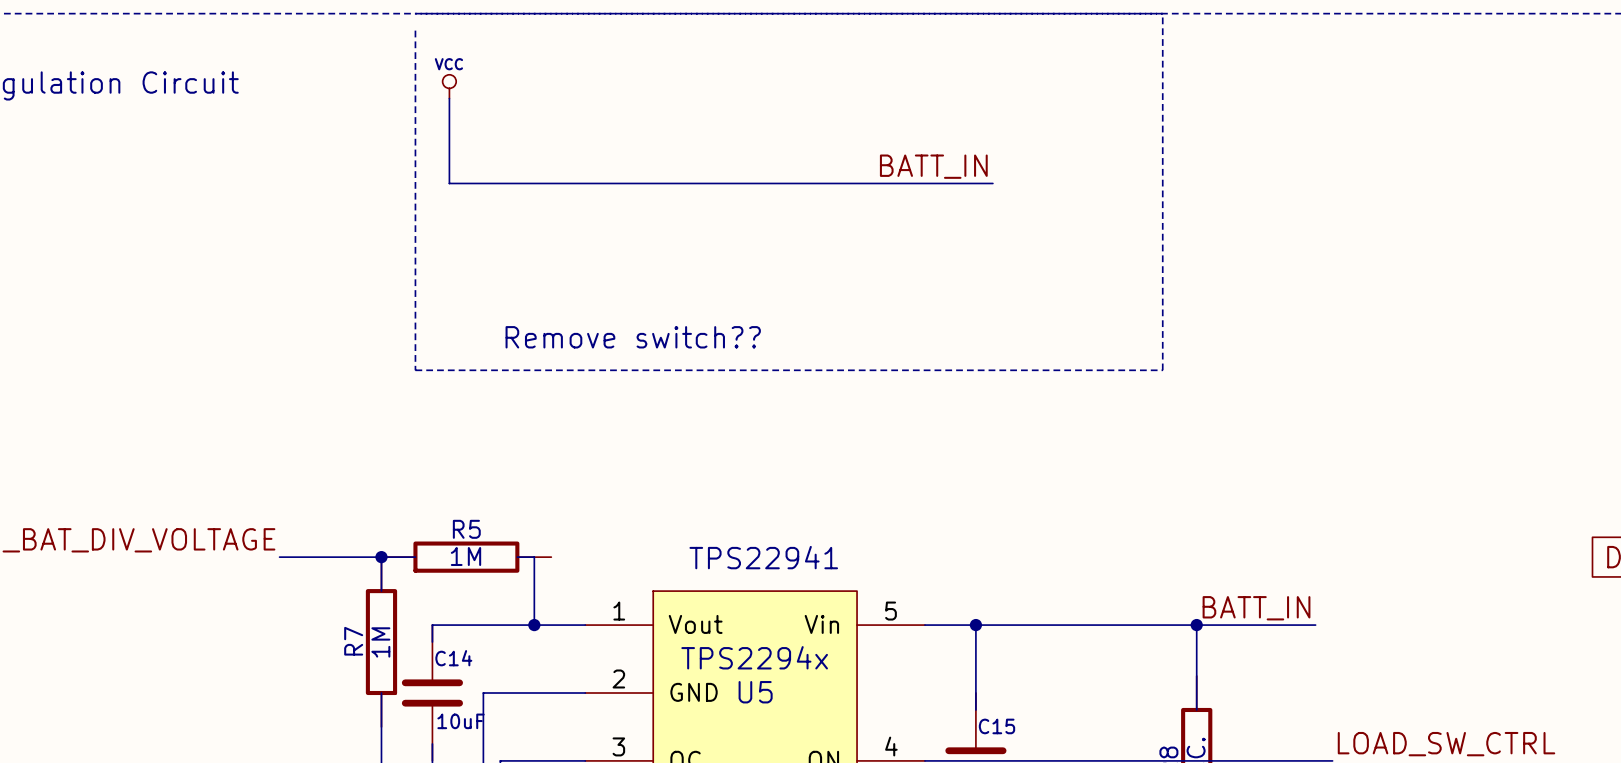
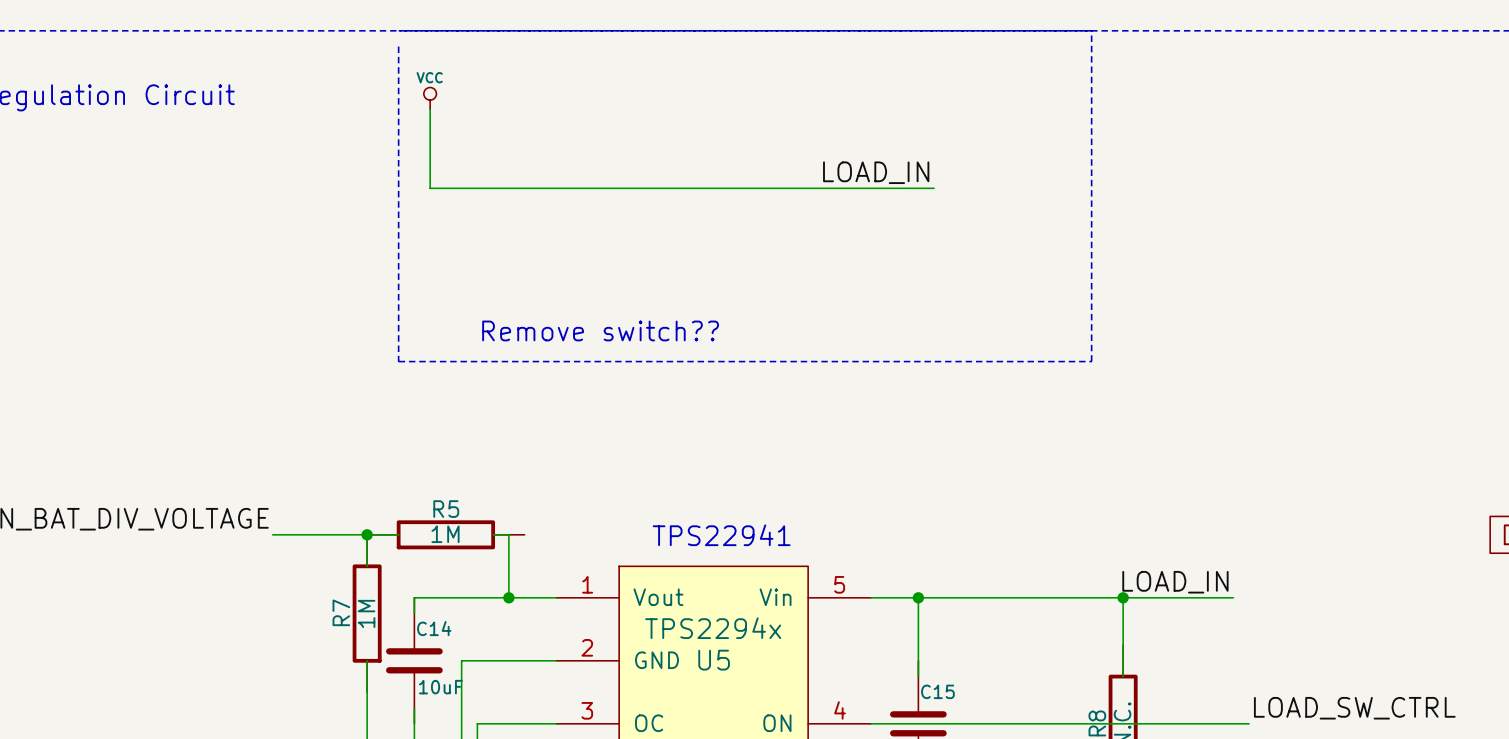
label: BATT_IN (933, 166) -> LOAD_IN (876, 172)
label: BATT_IN (1256, 608) -> LOAD_IN (1175, 582)

